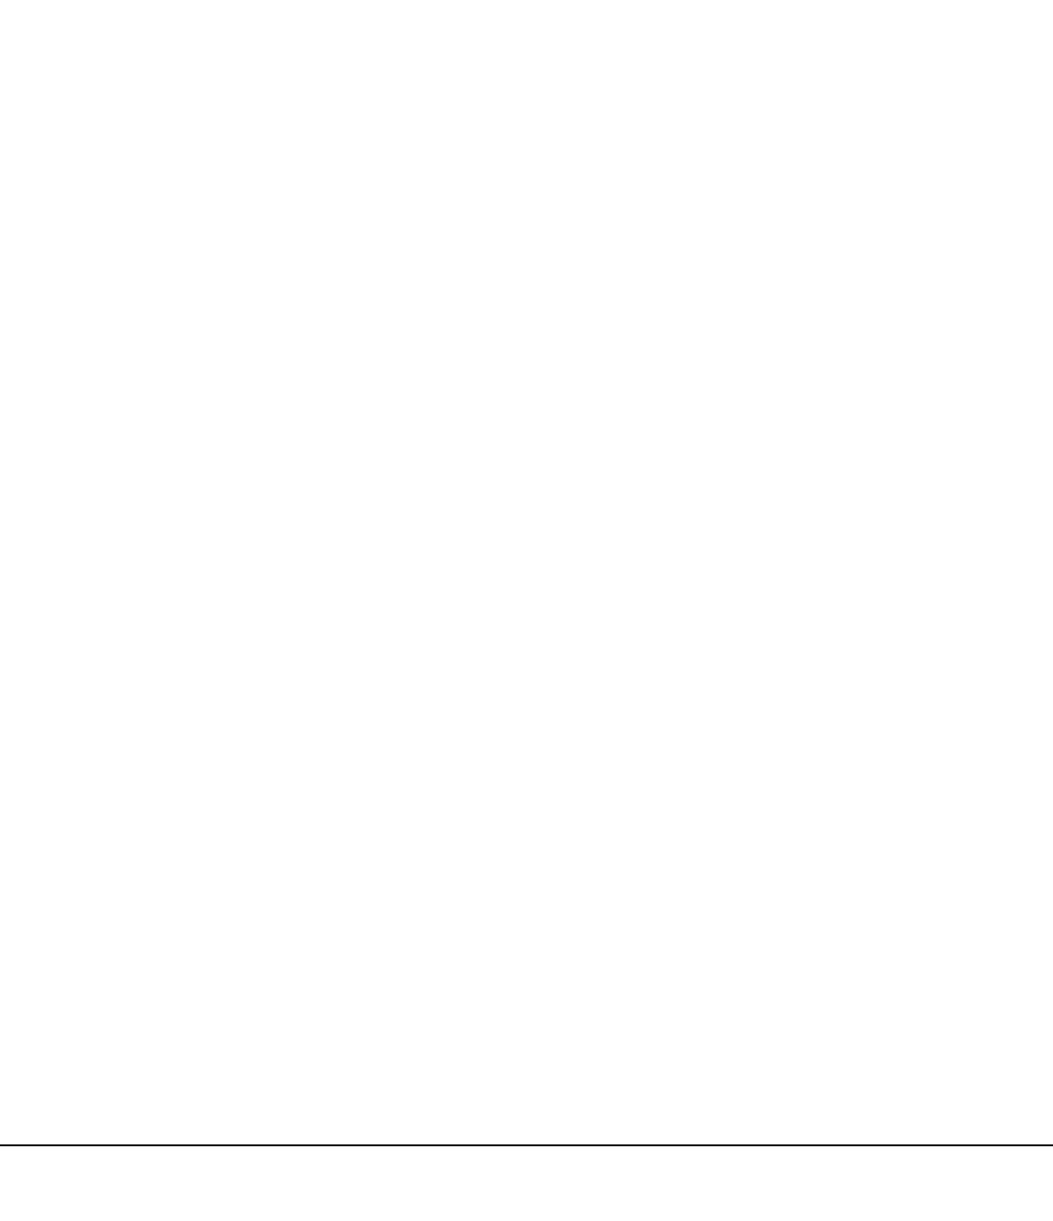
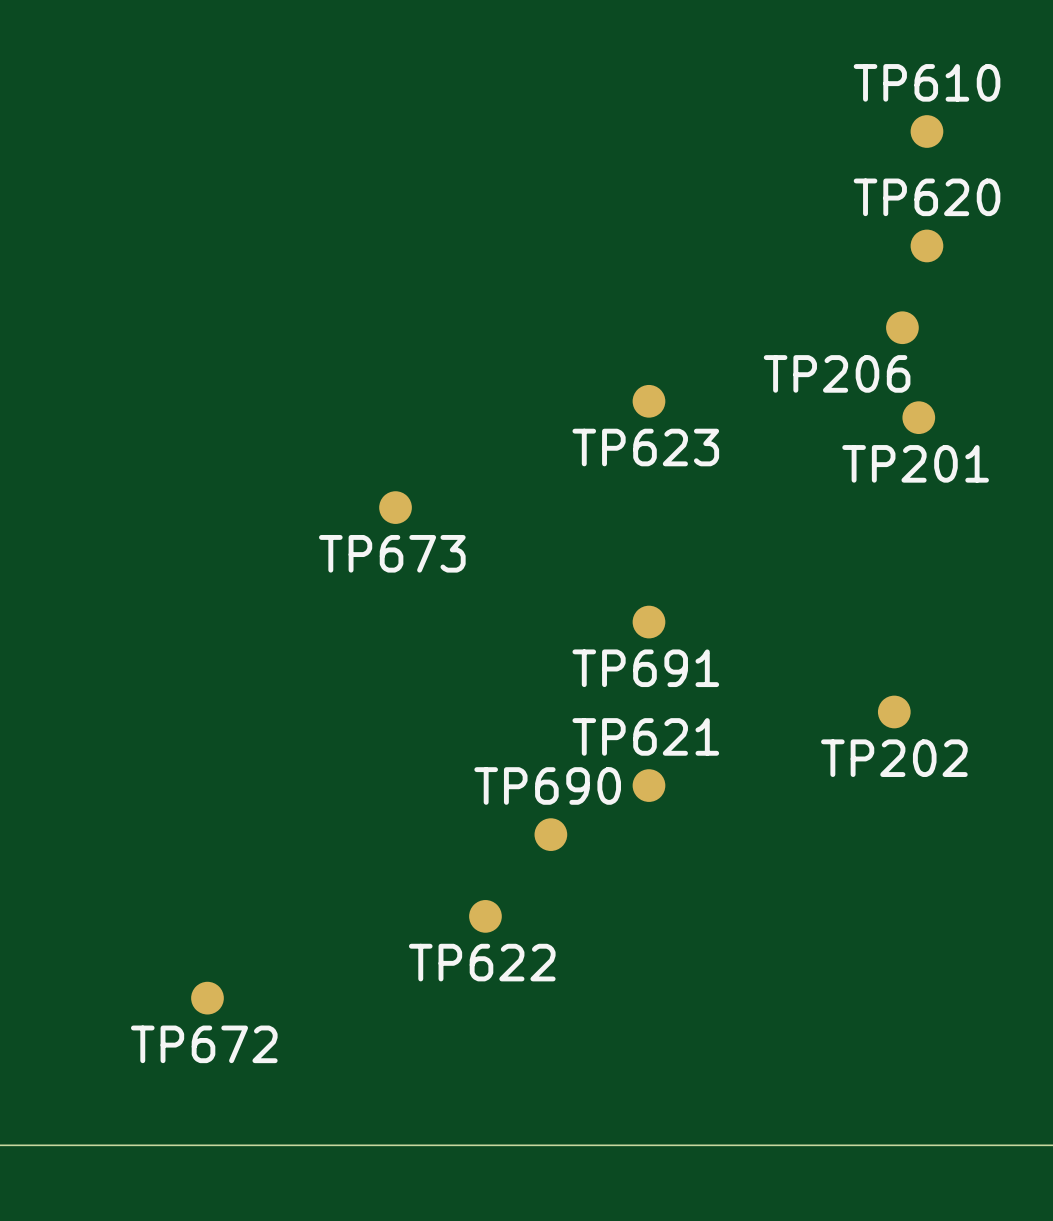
TP610: none -> (926, 131)
TP620: none -> (926, 245)
TP206: none -> (902, 327)
TP623: none -> (648, 401)
TP201: none -> (918, 417)
TP673: none -> (395, 507)
TP691: none -> (648, 622)
TP202: none -> (894, 711)
TP621: none -> (648, 785)
TP690: none -> (550, 834)
TP622: none -> (485, 916)
TP672: none -> (207, 998)

